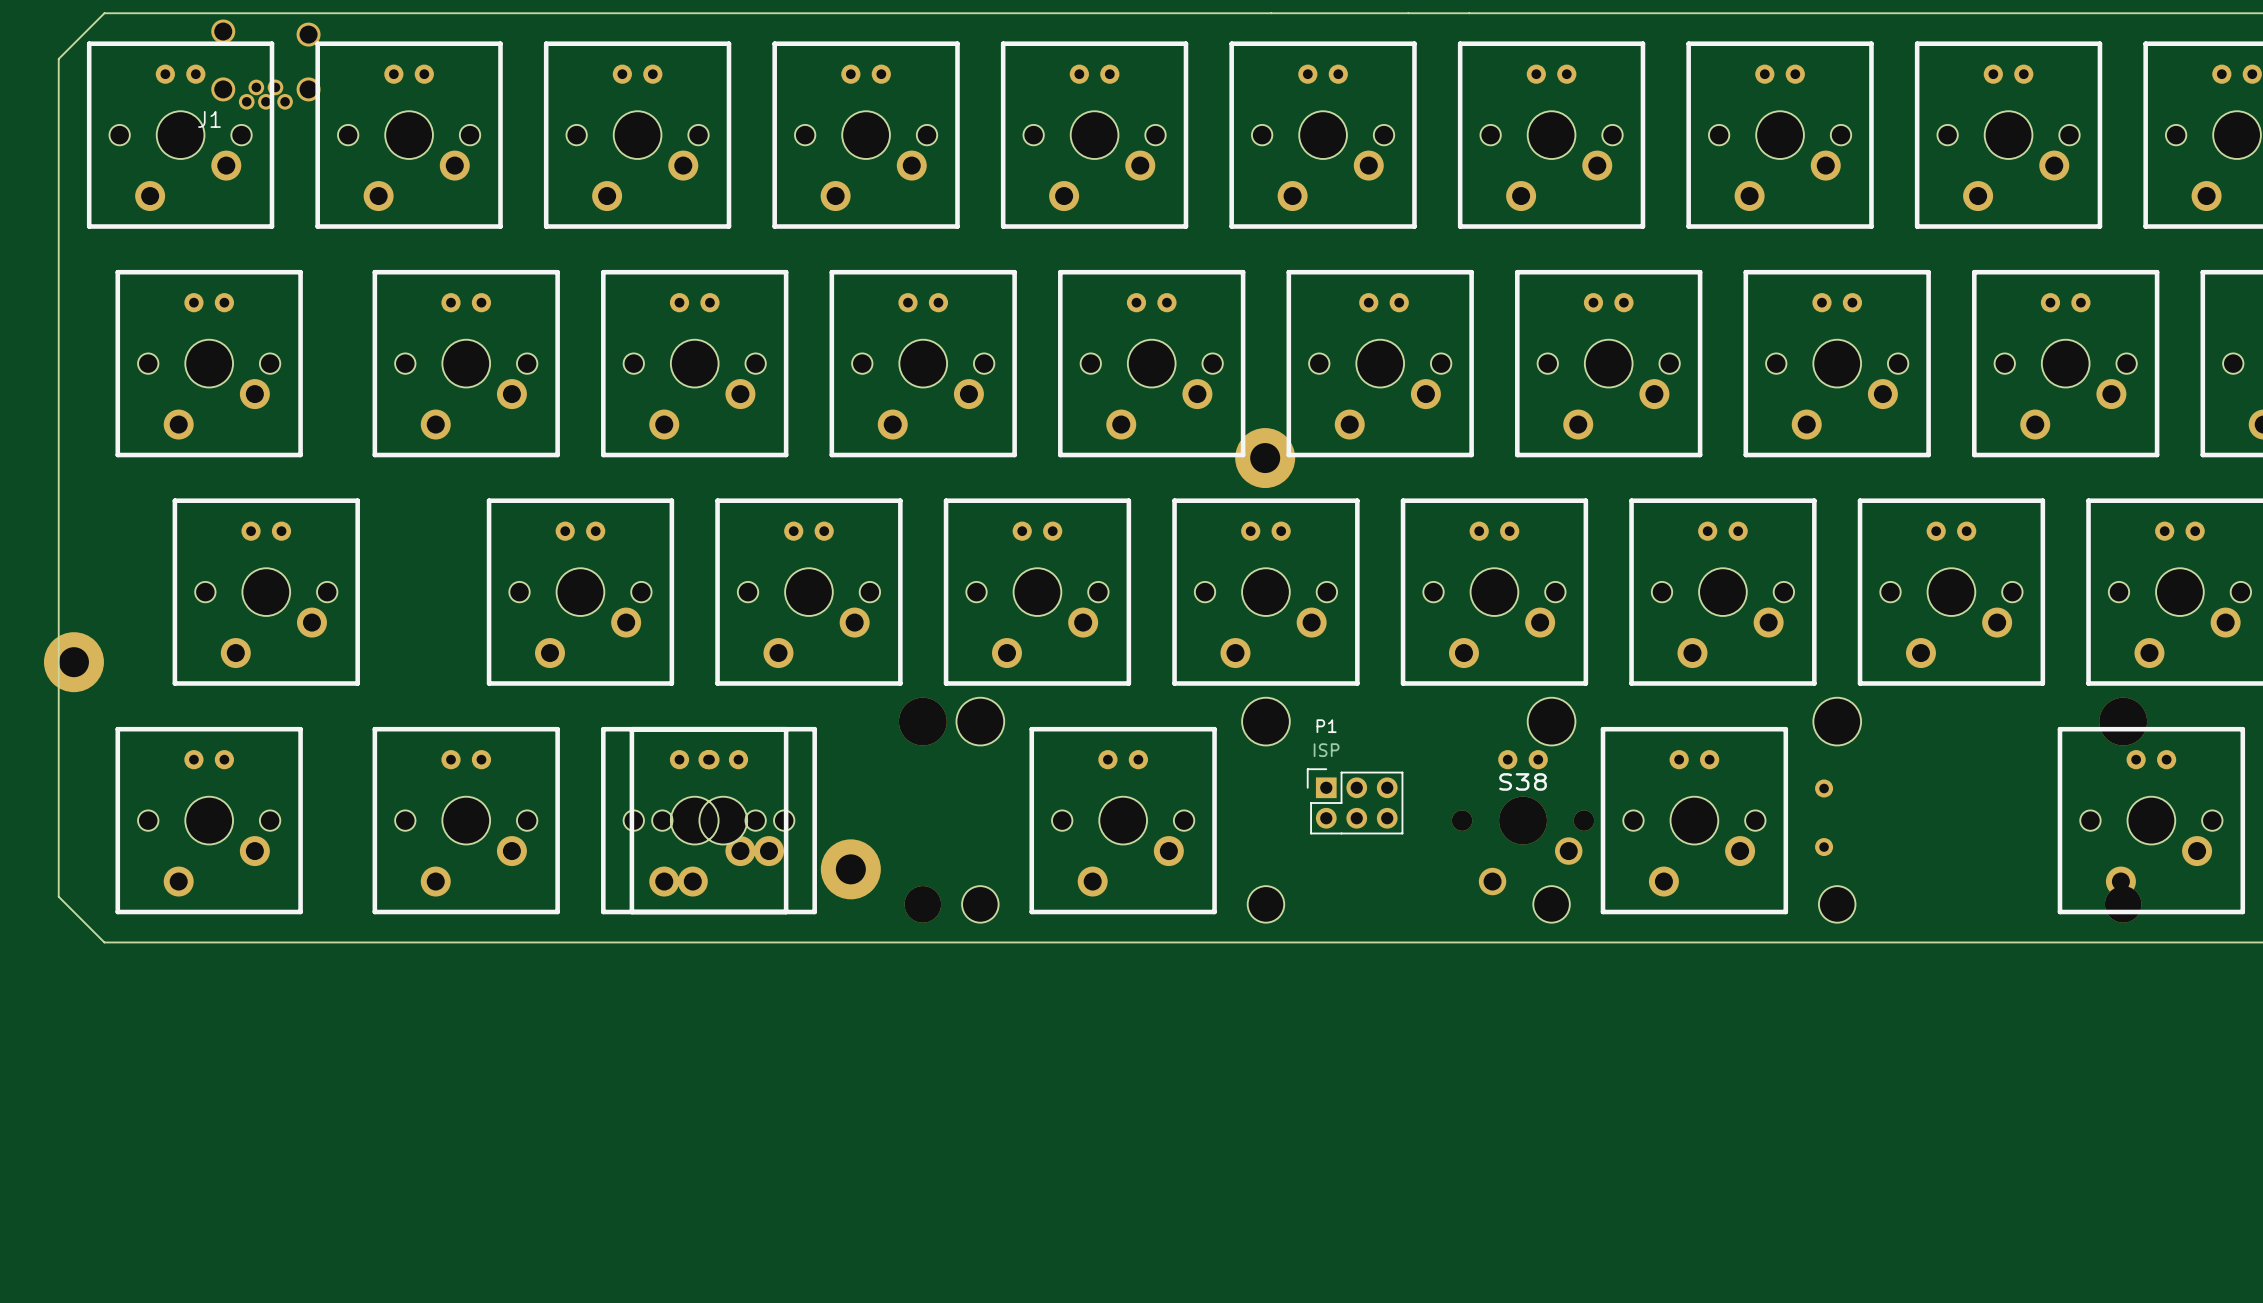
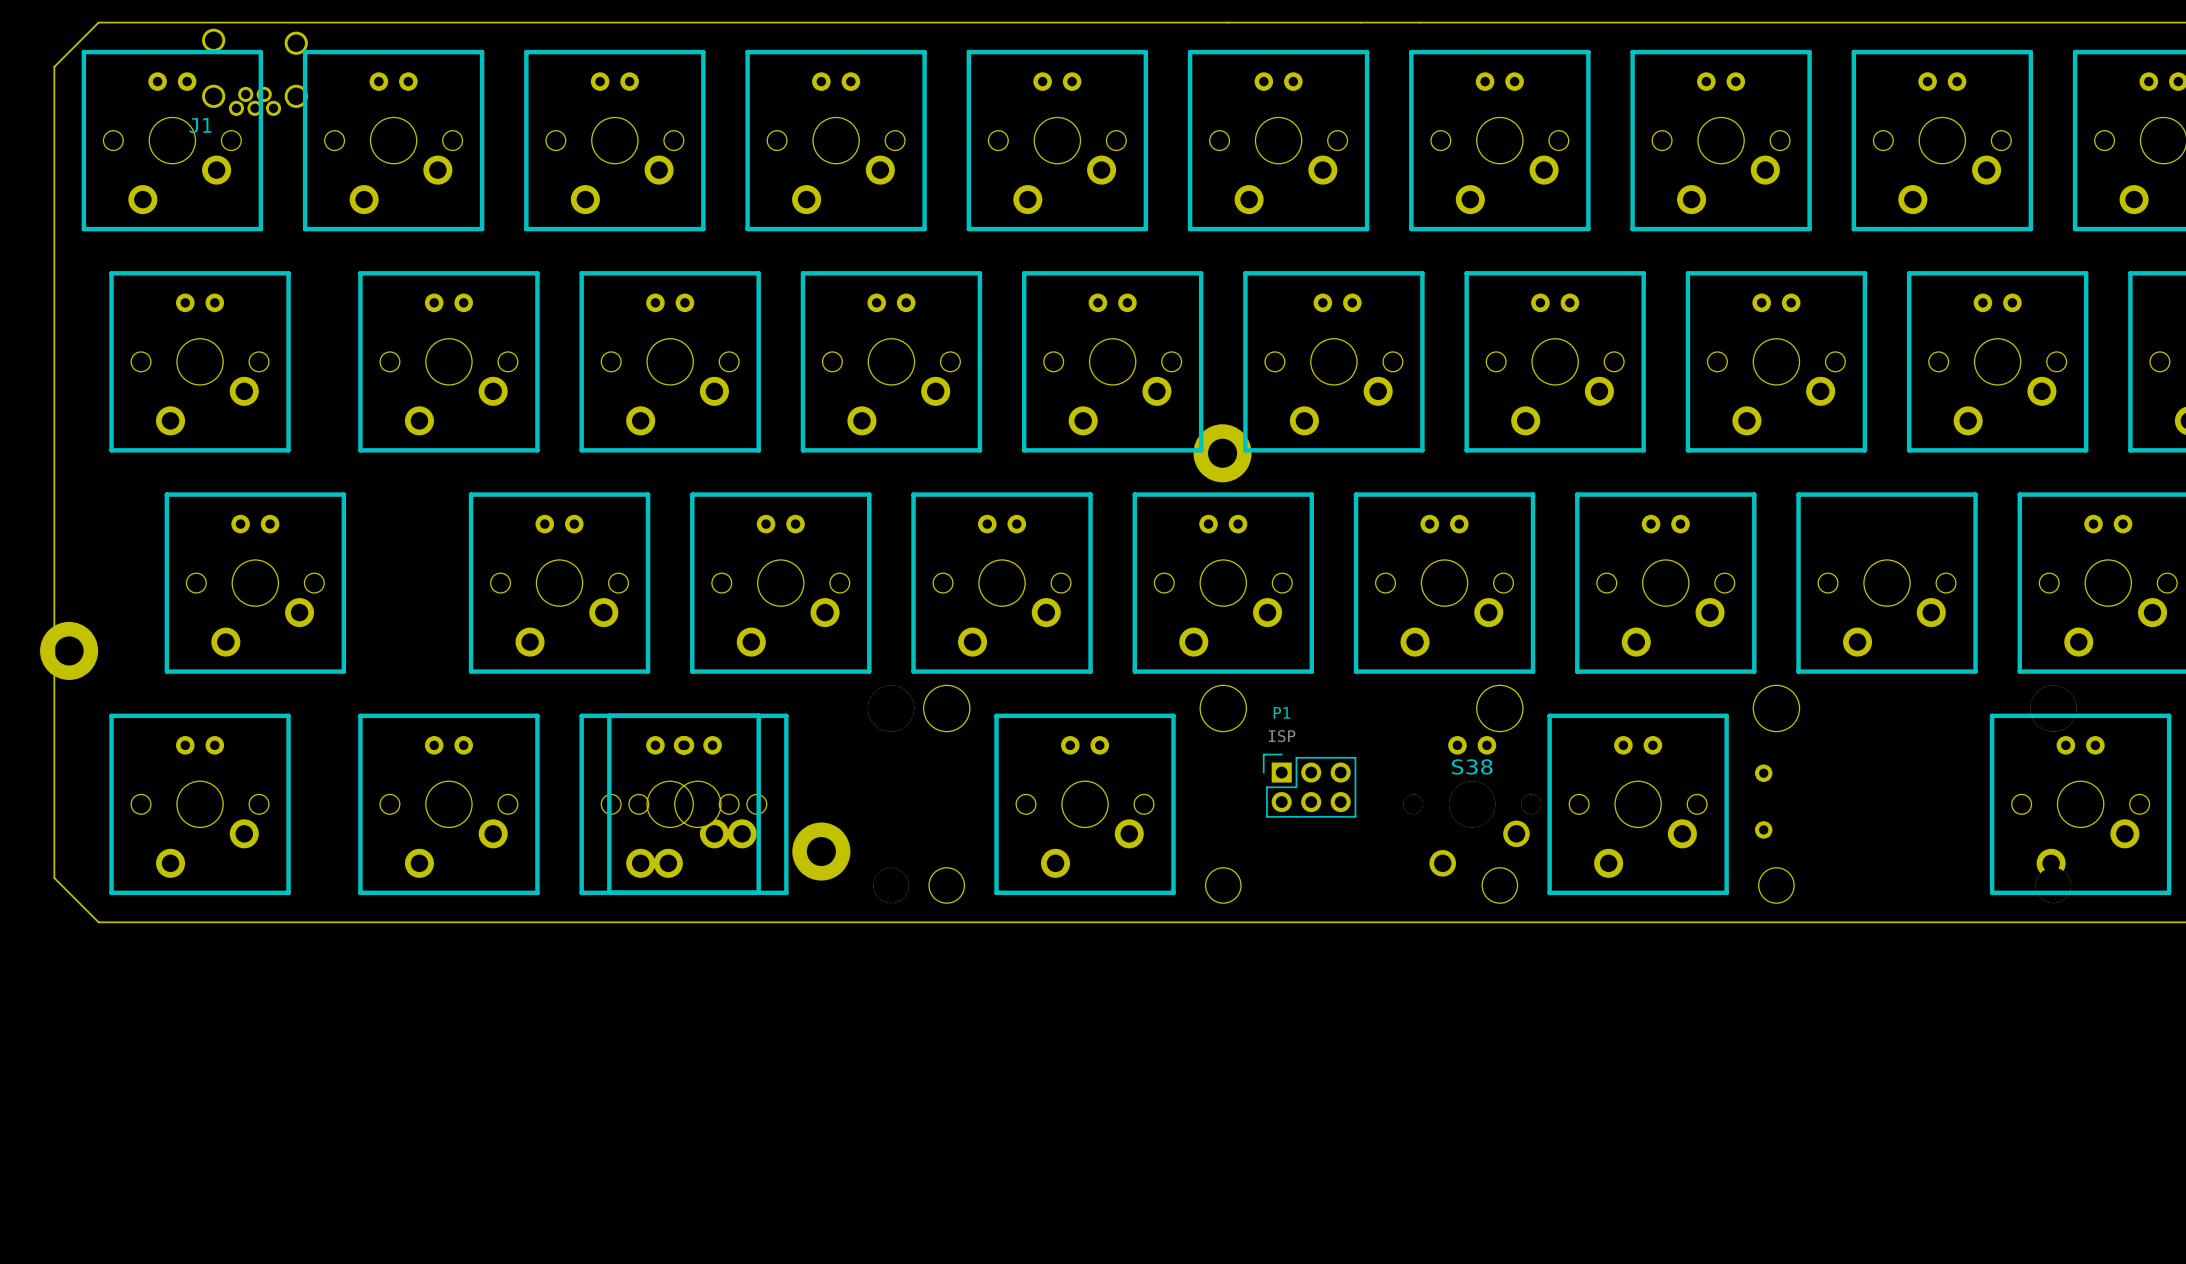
part: (1951, 531) -> none

